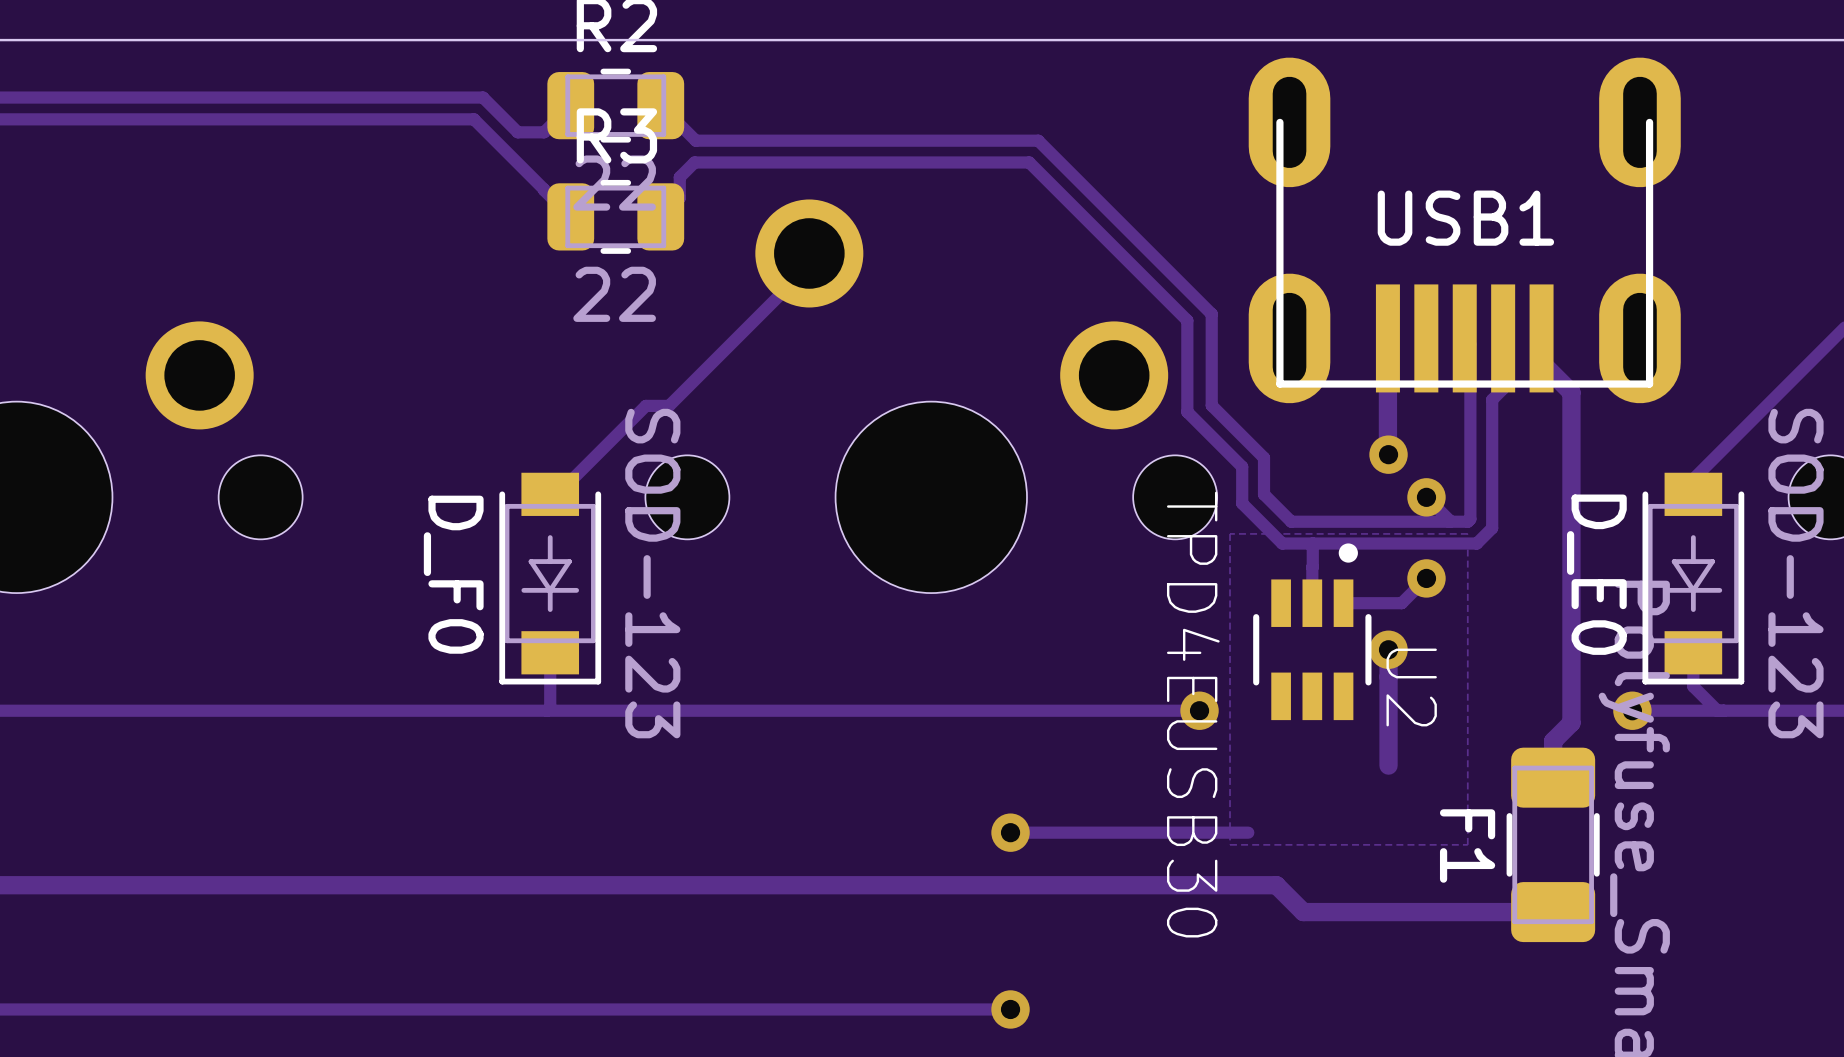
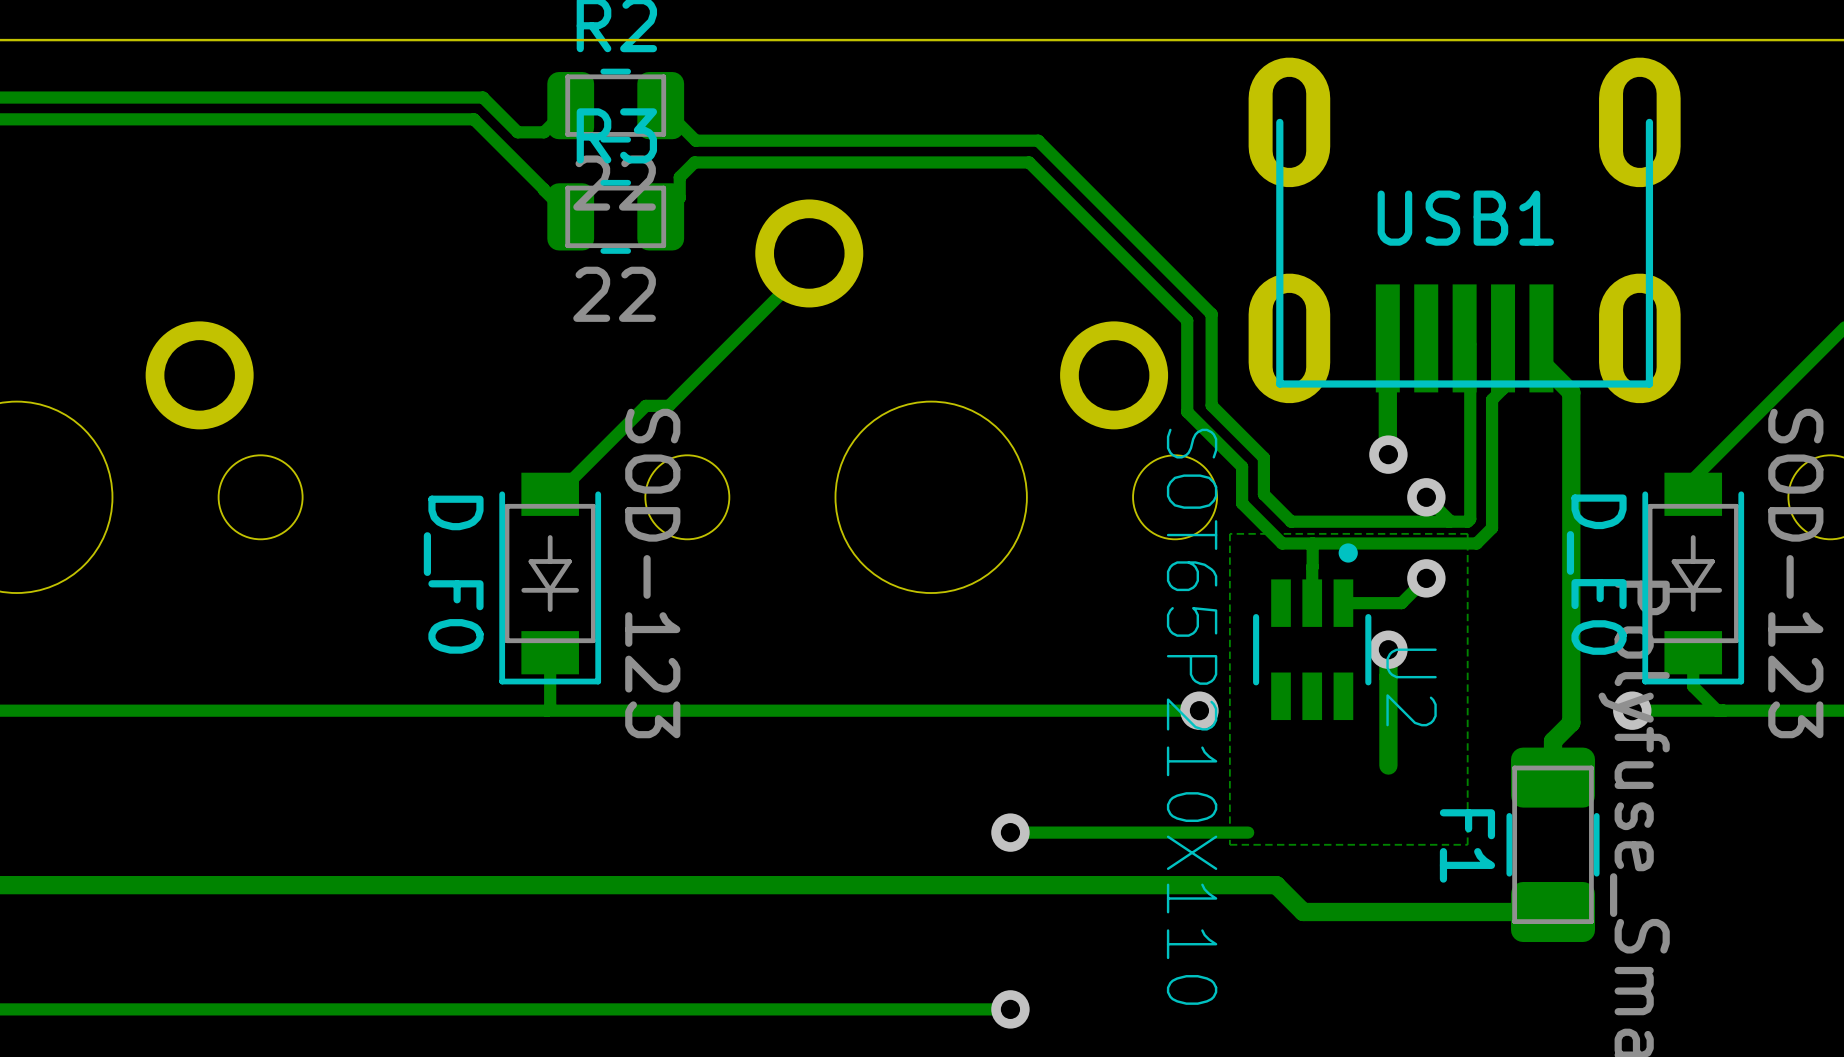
U2 value: TPD4EUSB30 (1193, 714) -> SOT65P210X110 (1192, 716)

